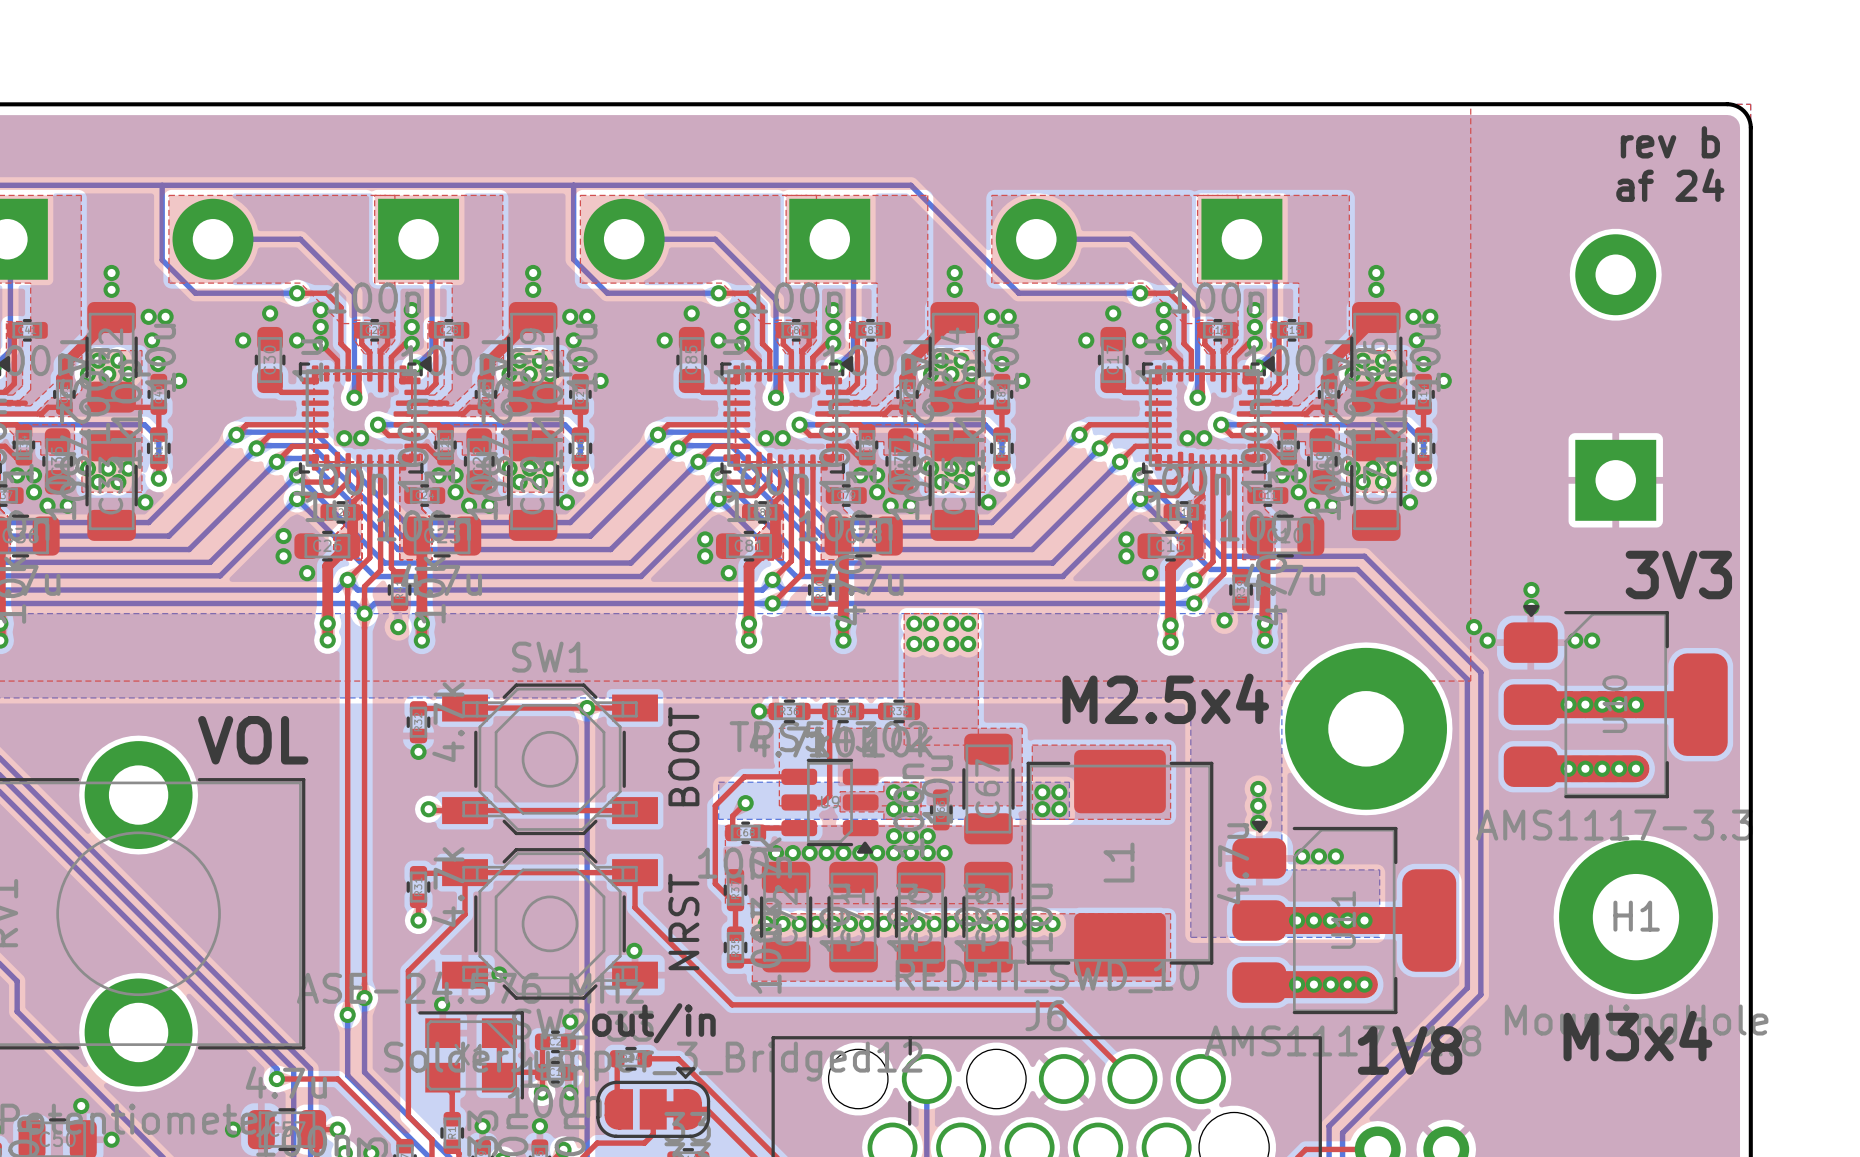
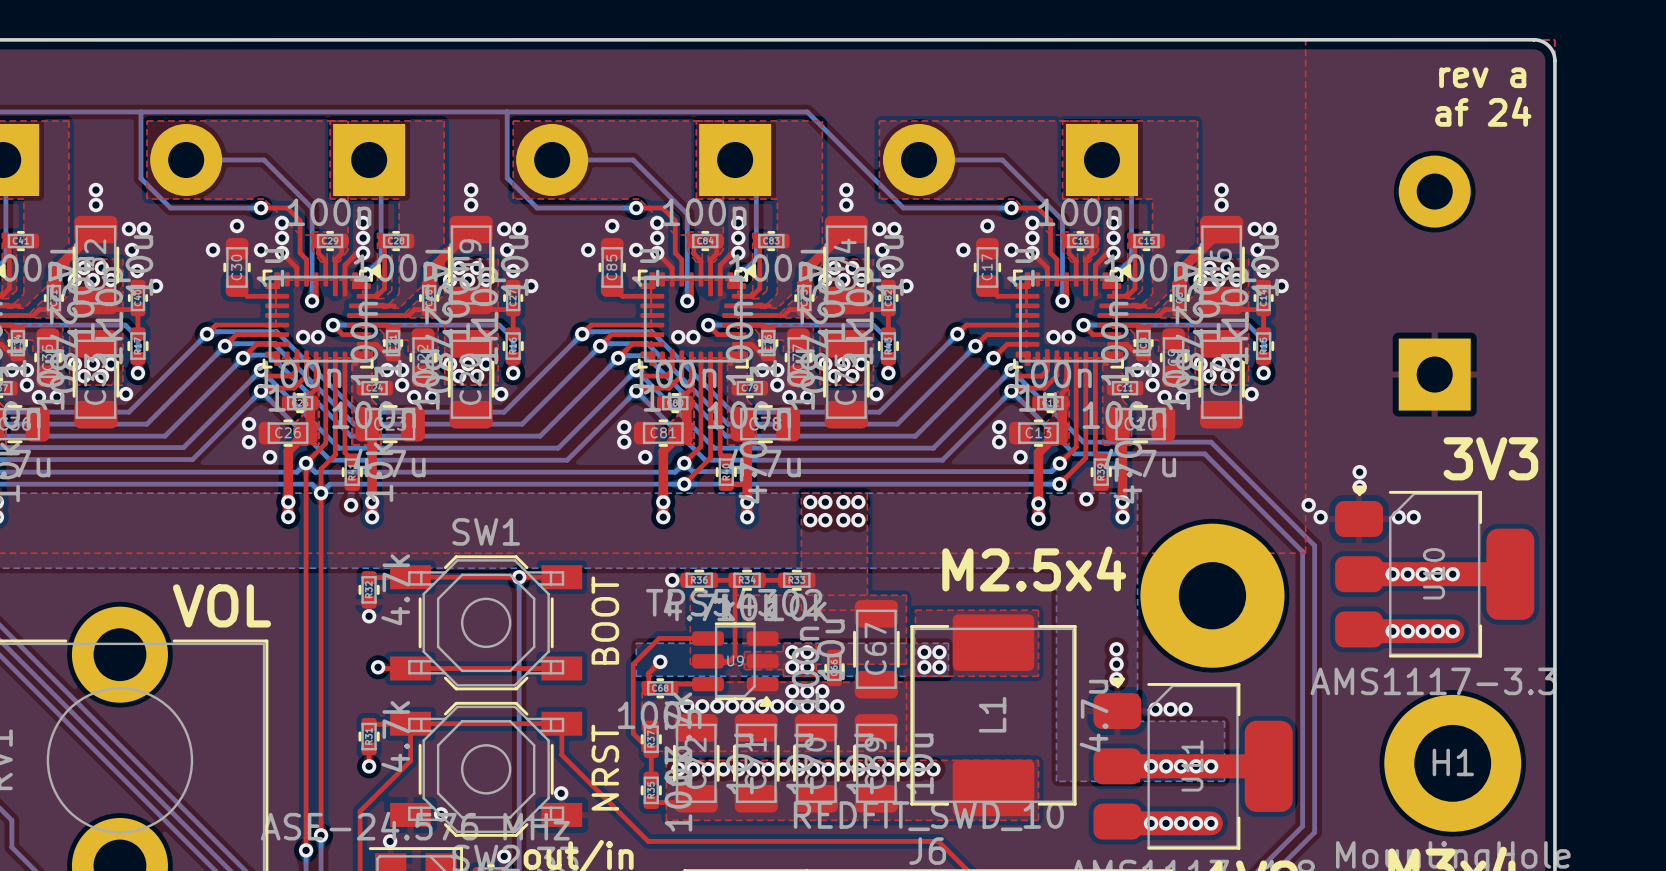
text: rev b (1670, 142) -> rev a (1482, 77)

